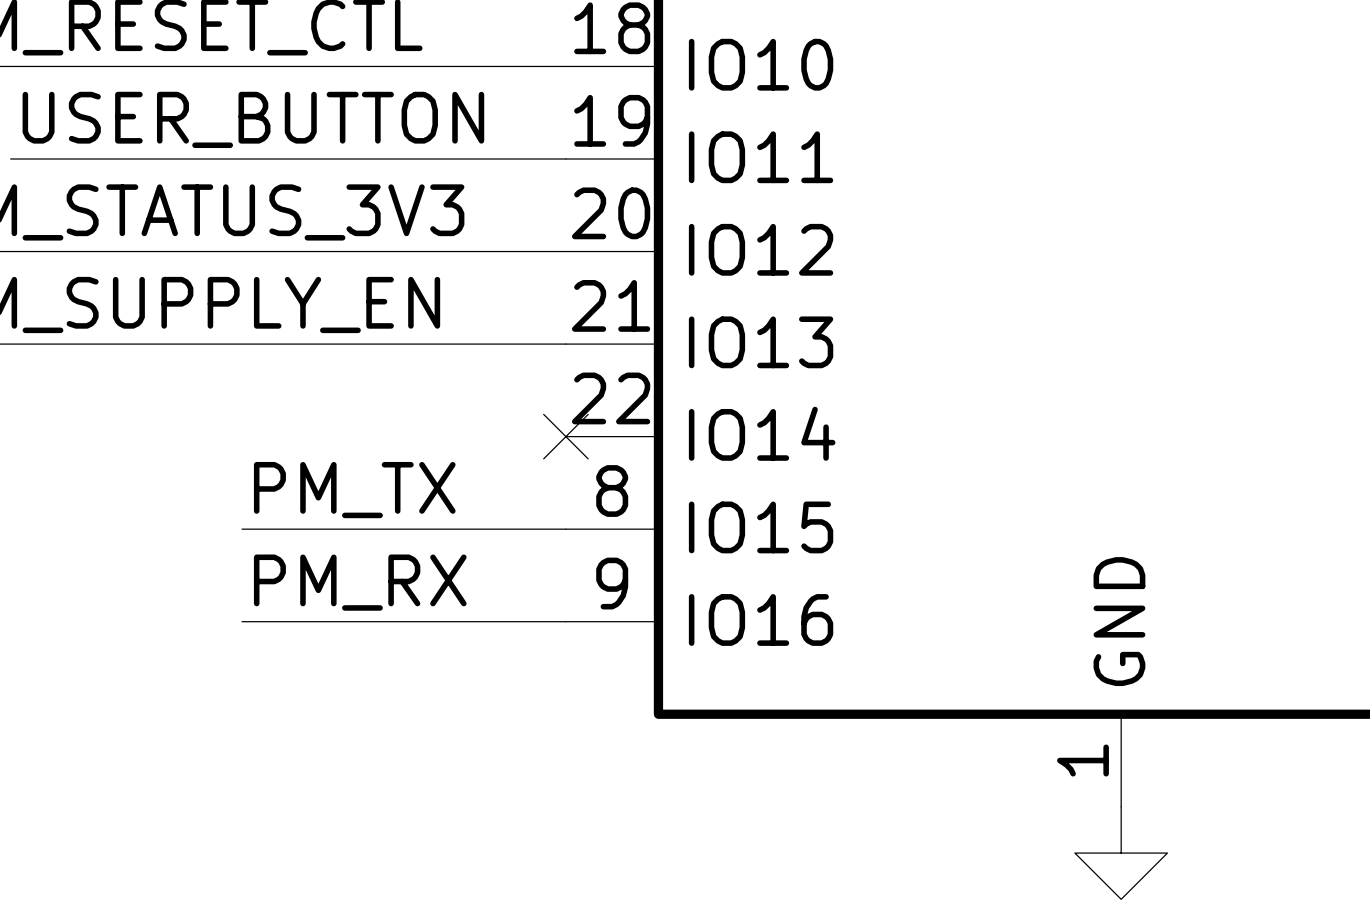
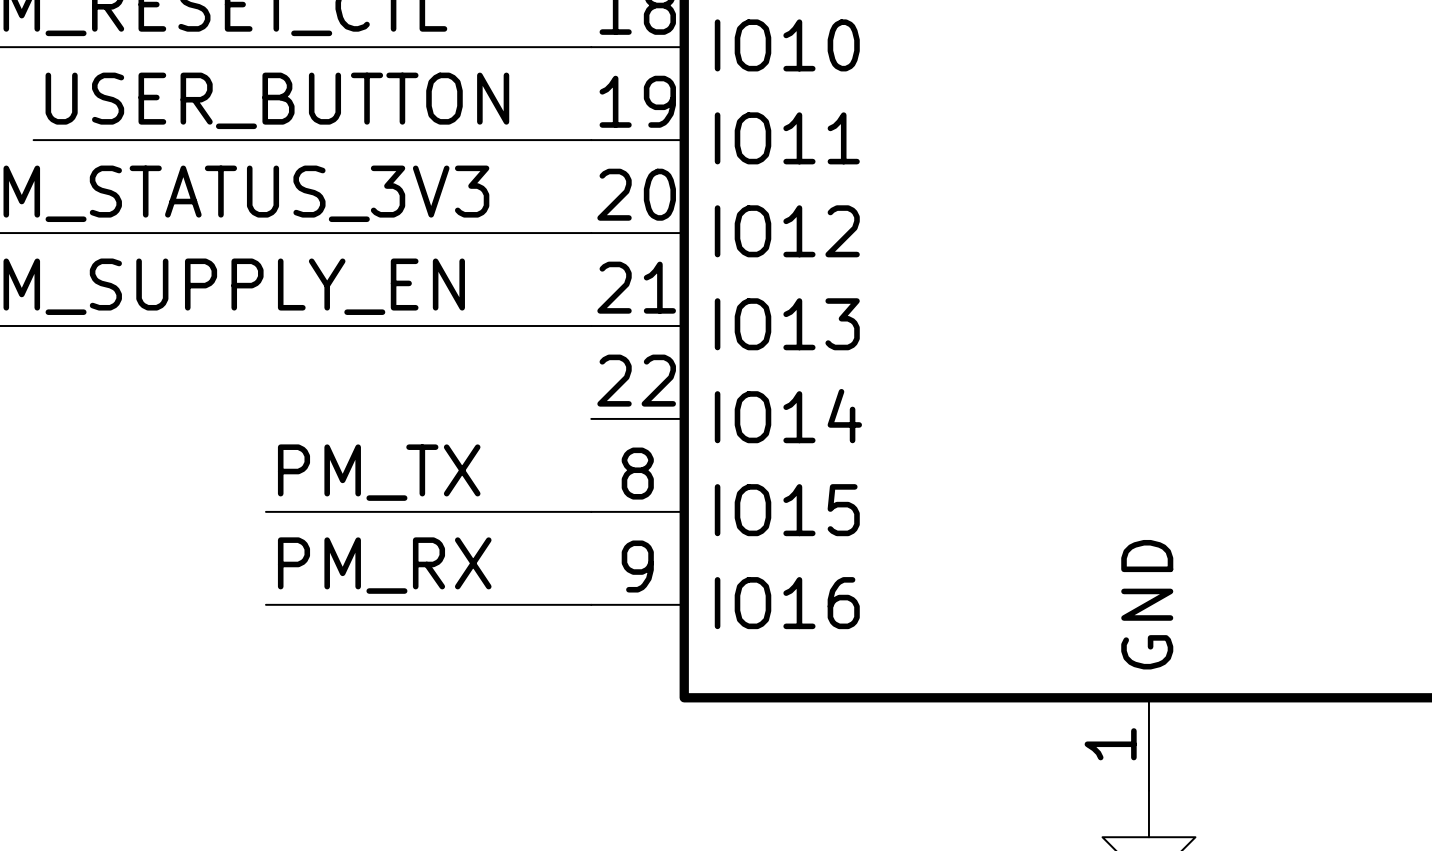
no-connect mark: (565, 436) -> none

